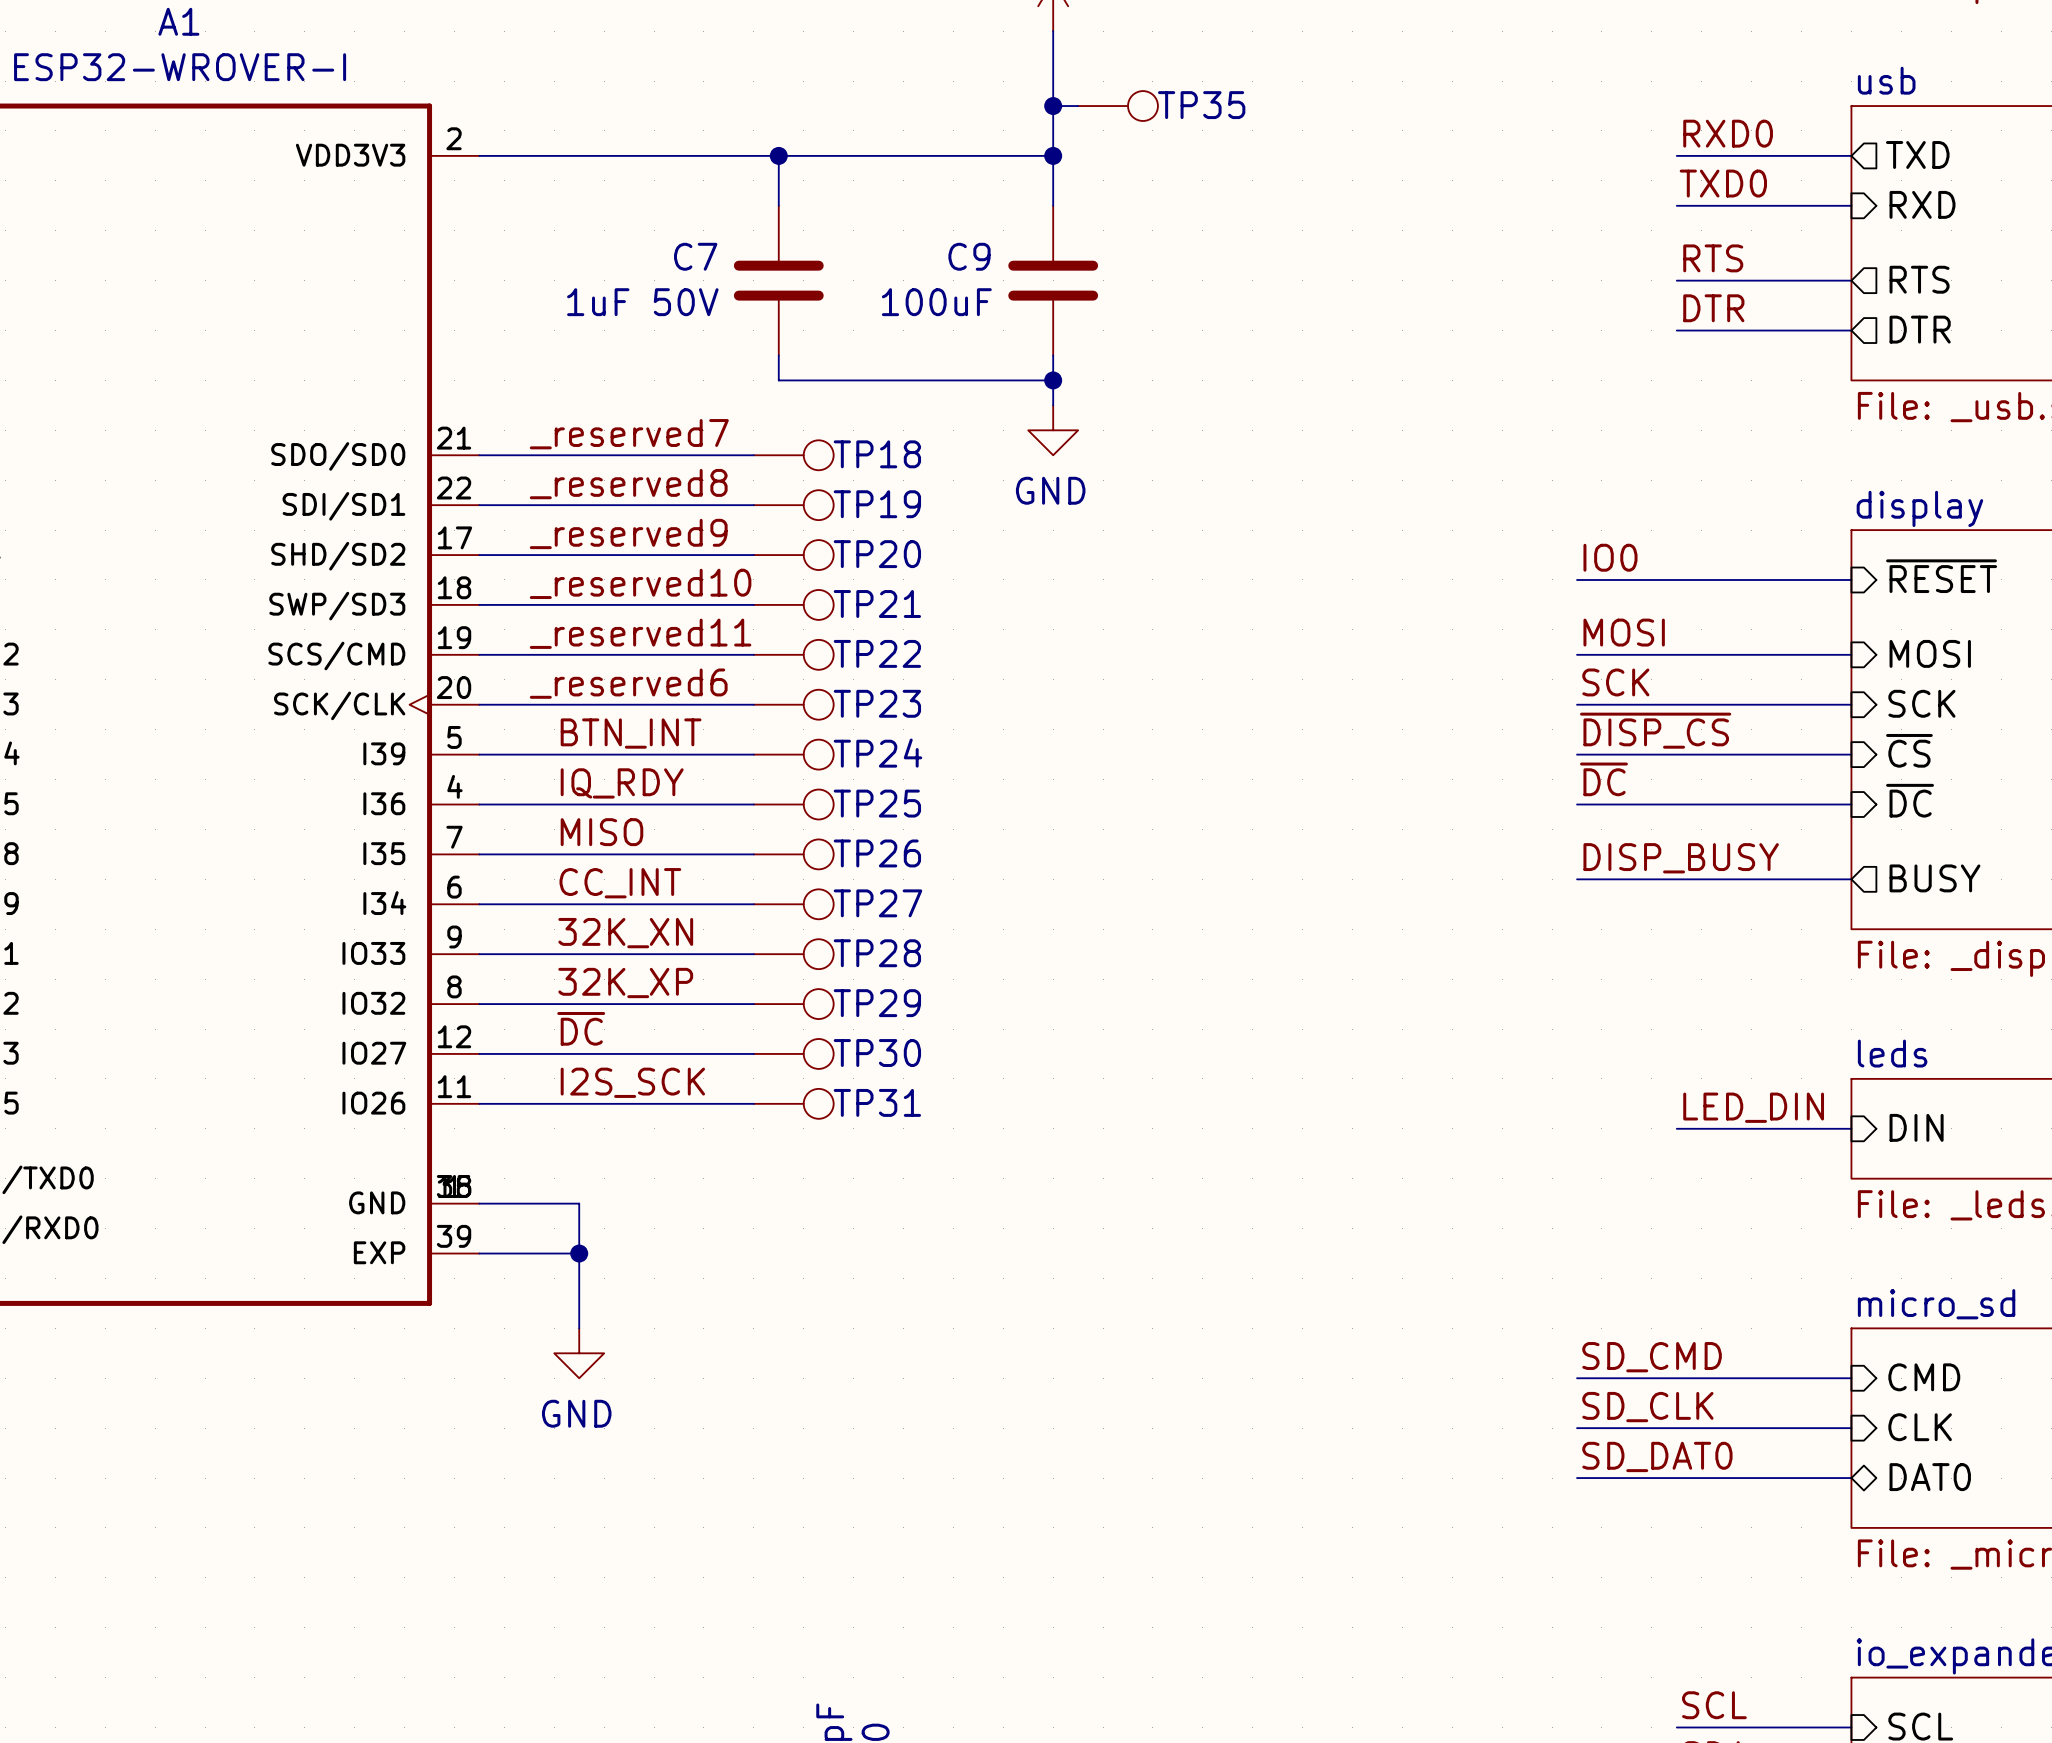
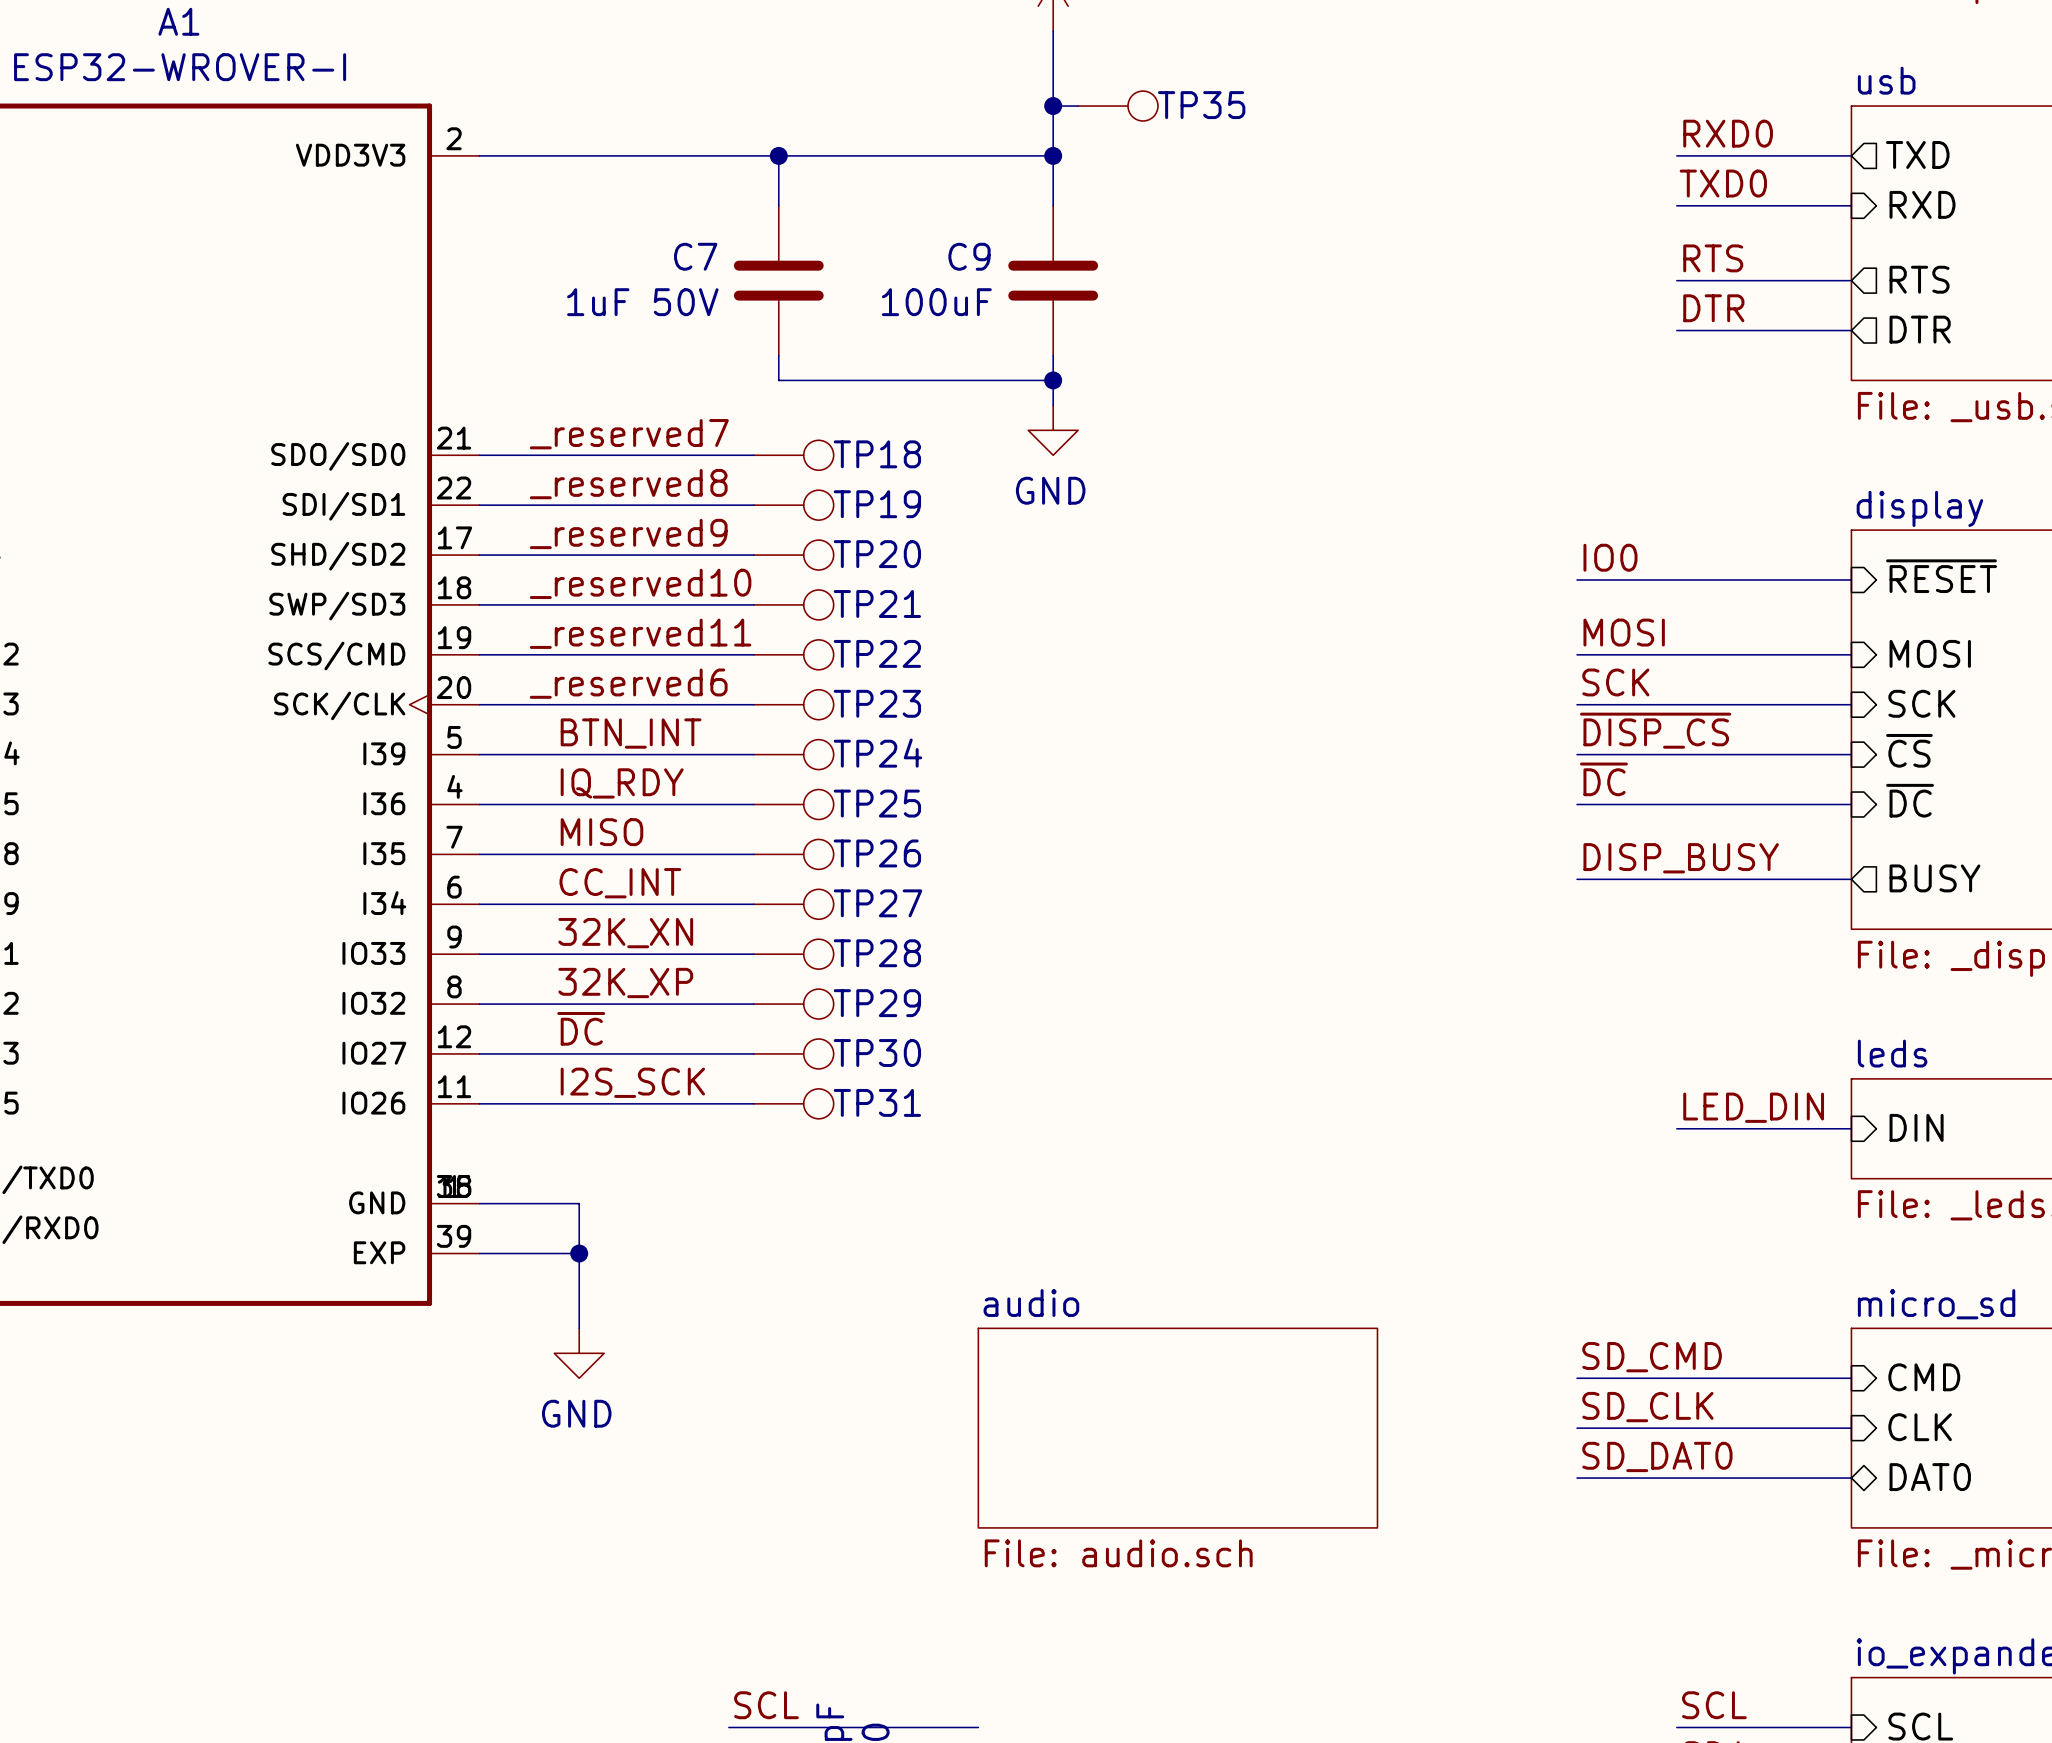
sheet audio: none -> File: audio.sch (1177, 1428)
label: none -> SCL (766, 1705)
wire: none -> (728, 1727) (978, 1727)

